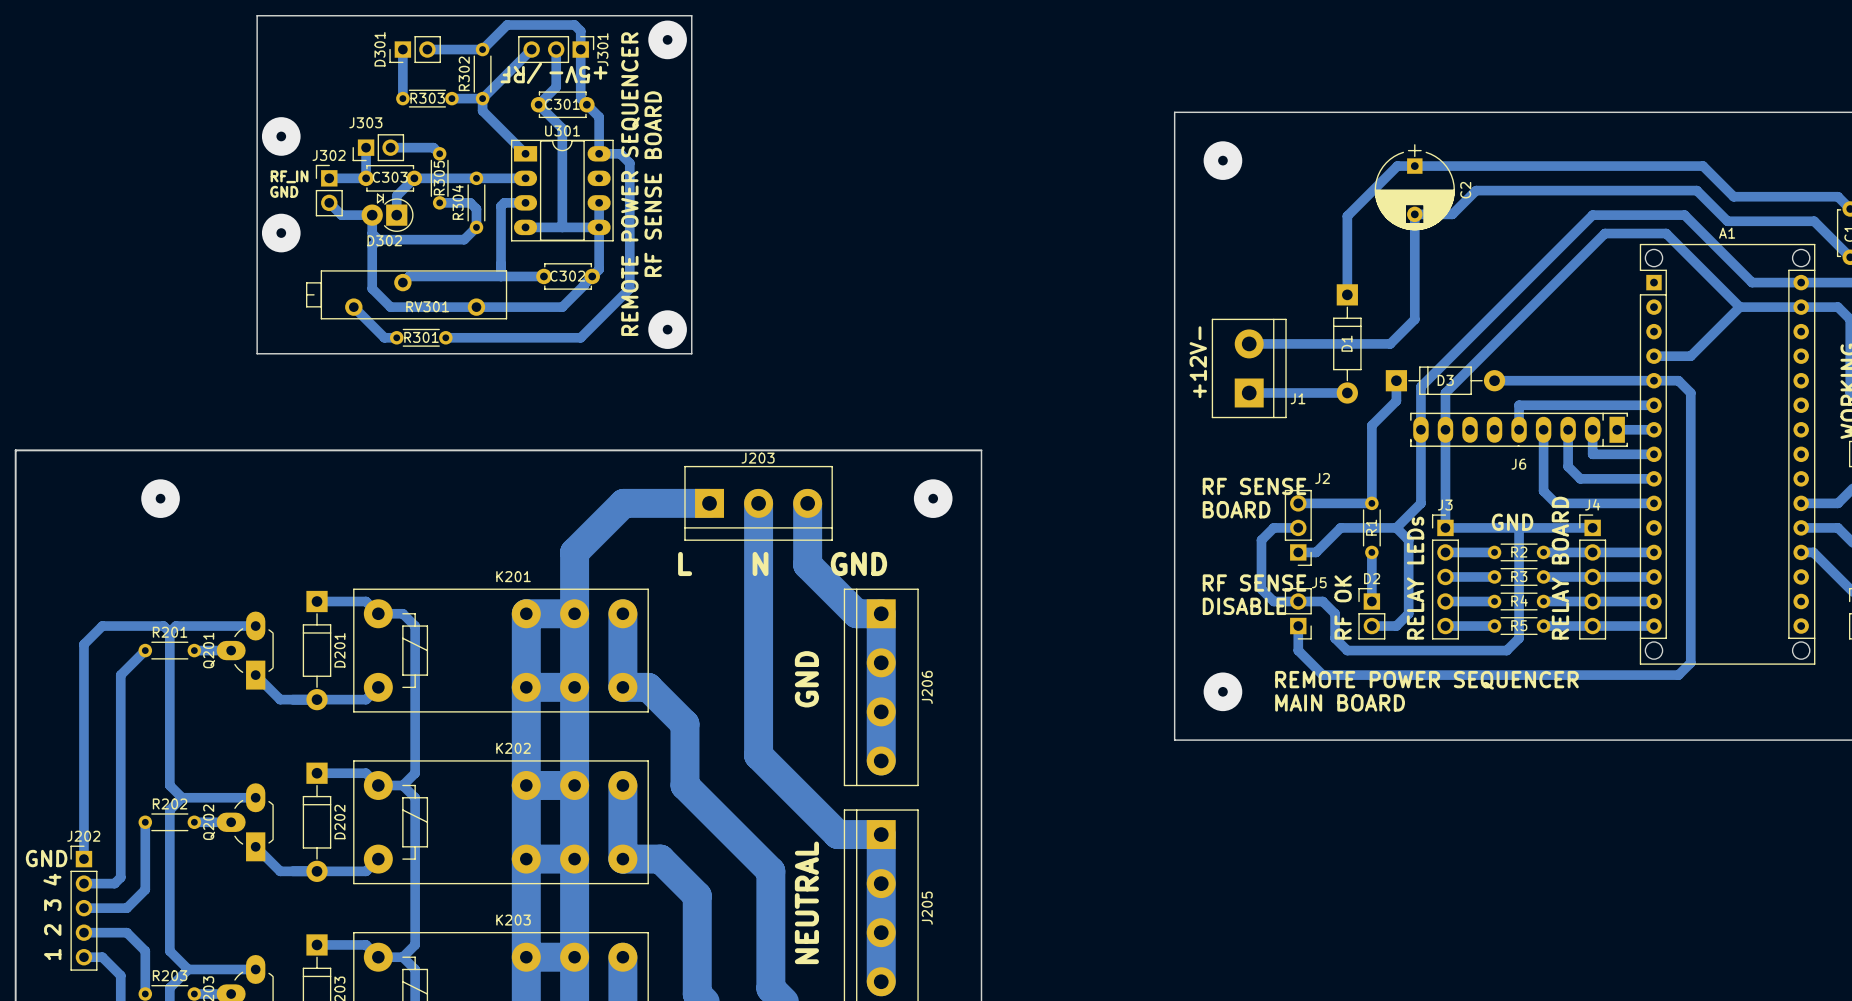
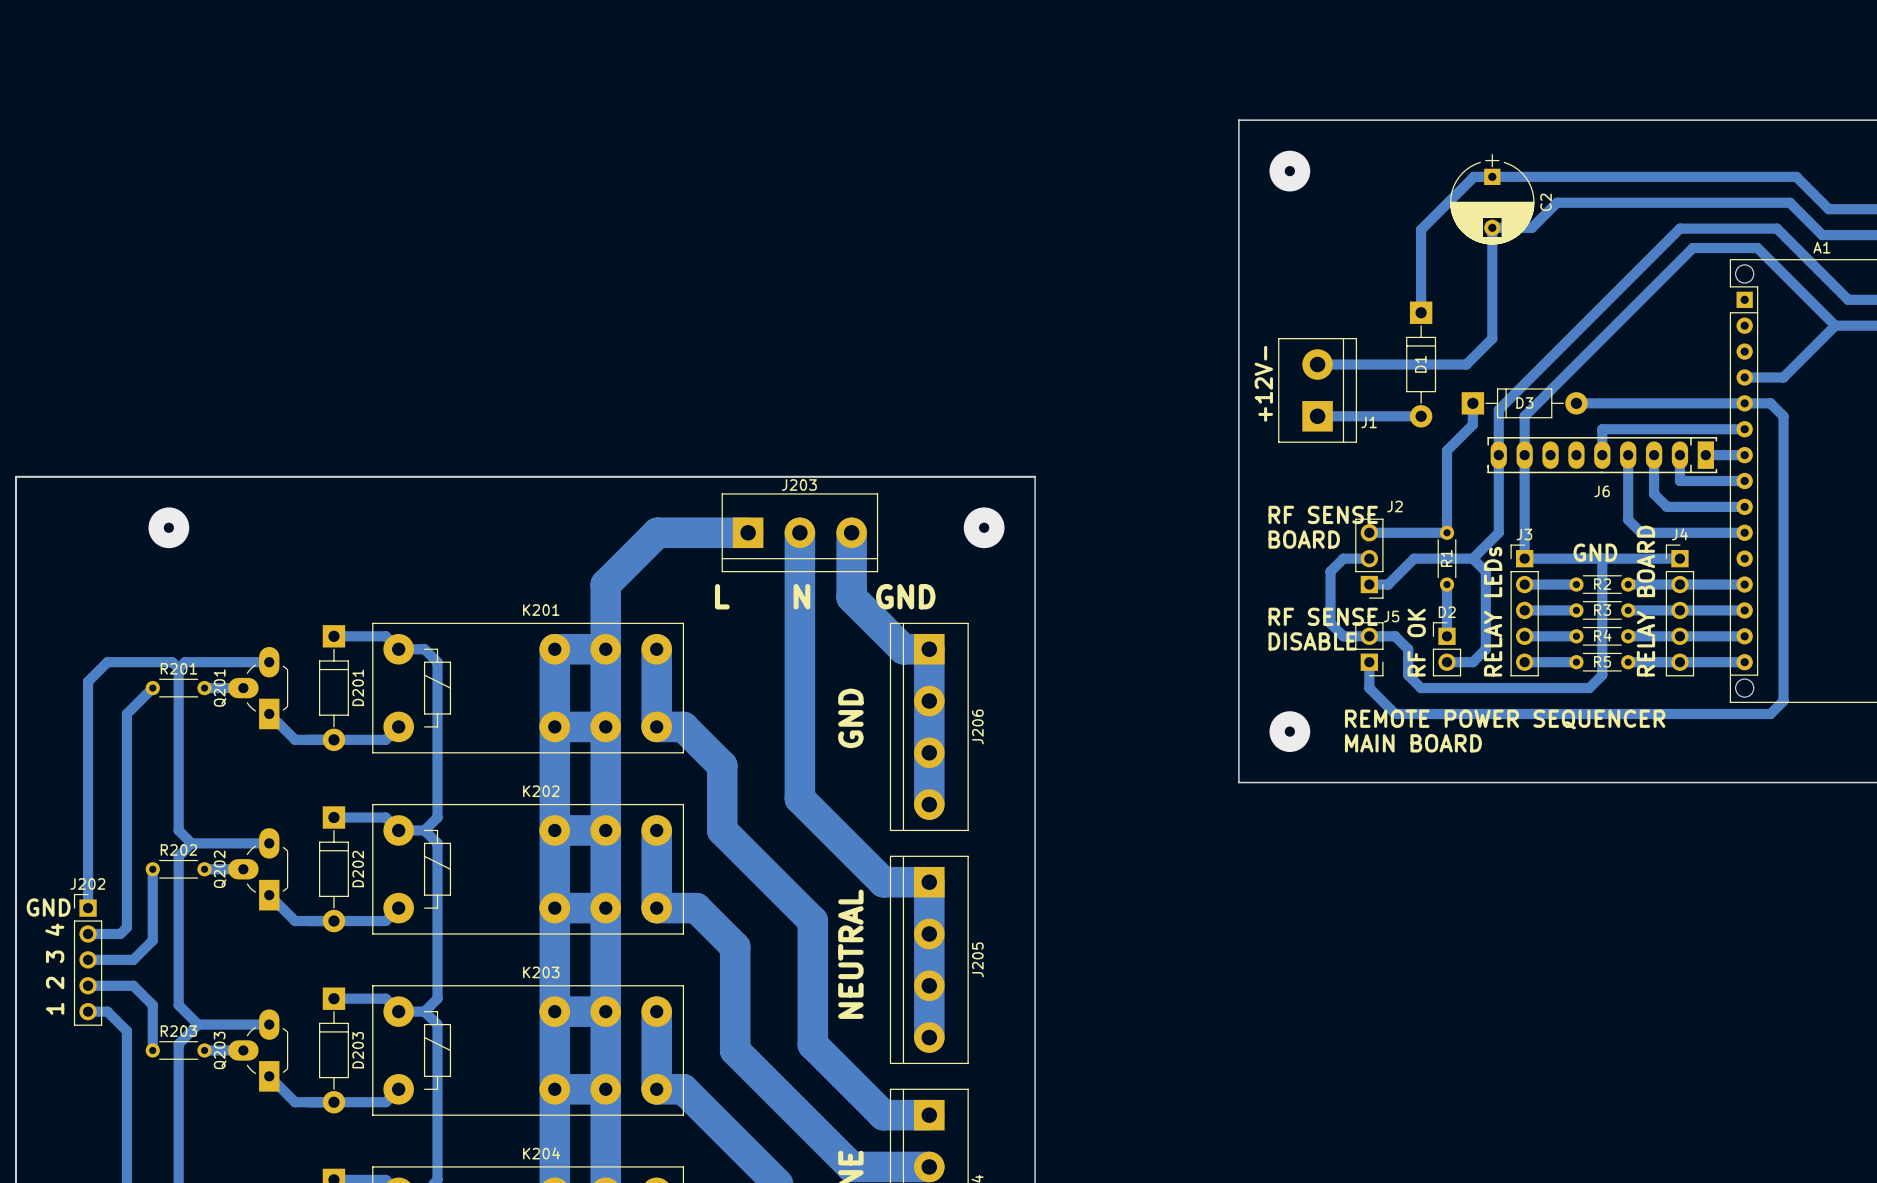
board edge: (257, 15) (691, 15) (691, 353) (257, 353) (257, 15) -> none
via: (667, 39) -> none
bottom track: (402, 49) (402, 98) -> none
D301: (415, 49) -> none
bottom track: (427, 49) (482, 49) (507, 25) (574, 25) (580, 31) (580, 98) (599, 117) (599, 153) (620, 153) (629, 163) (629, 288) (580, 337) (445, 337) -> none
bottom track: (531, 49) (482, 98) -> none
bottom track: (556, 49) (556, 87) (538, 104) (562, 128) (562, 227) -> none
J301: (556, 49) -> none
text: /RF (521, 73) -> none
R302: (482, 74) -> none
text: +5V- (578, 74) -> none
R303: (427, 98) -> none
bottom track: (451, 98) (482, 98) -> none
bottom track: (482, 98) (482, 110) (525, 153) -> none
C301: (562, 104) -> none
via: (281, 136) -> none
bottom track: (366, 147) (366, 178) (329, 178) -> none
J303: (378, 147) -> none
bottom track: (390, 147) (433, 147) (439, 153) -> none
text: RF_IN (289, 176) -> none
C303: (390, 178) -> none
R305: (439, 178) -> none
bottom track: (525, 178) (414, 178) (396, 195) (396, 215) -> none
text: REMOTE POWER SEQUENCER (630, 184) -> none
text: RF SENSE BOARD (653, 184) -> none
J302: (329, 190) -> none
U301: (562, 190) -> none
text: GND (284, 191) -> none
bottom track: (329, 202) (341, 215) (372, 215) (372, 233) (378, 239) -> none
bottom track: (439, 202) (470, 202) (476, 209) (476, 227) (464, 239) (378, 239) -> none
R304: (476, 202) -> none
bottom track: (525, 202) (504, 202) (501, 206) (501, 276) -> none
bottom track: (599, 202) (599, 269) (562, 307) (390, 307) (372, 288) (372, 245) (378, 239) -> none
D302: (387, 212) -> none
bottom track: (525, 227) (599, 227) -> none
via: (281, 233) -> none
bottom track: (543, 276) (409, 276) (402, 282) -> none
C302: (568, 276) -> none
RV301: (406, 294) -> none
bottom track: (353, 307) (384, 337) (396, 337) -> none
via: (667, 329) -> none
R301: (421, 337) -> none

